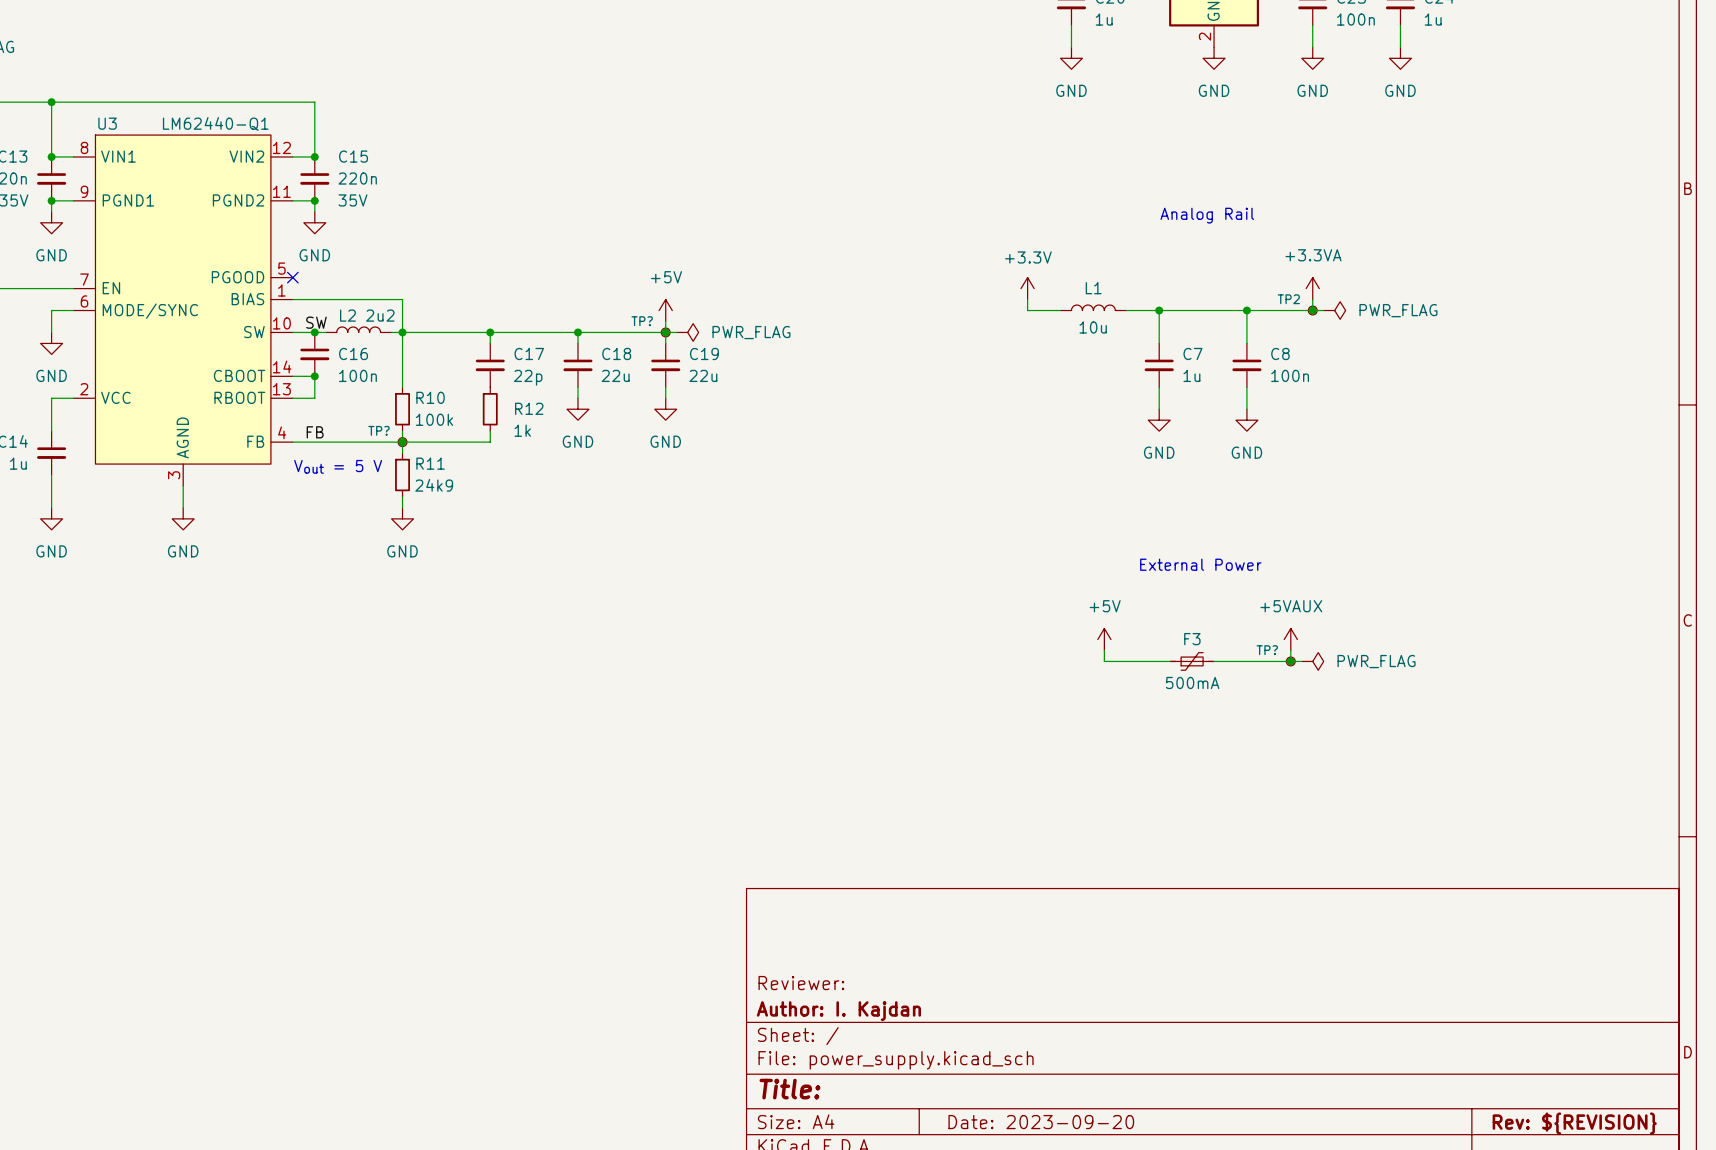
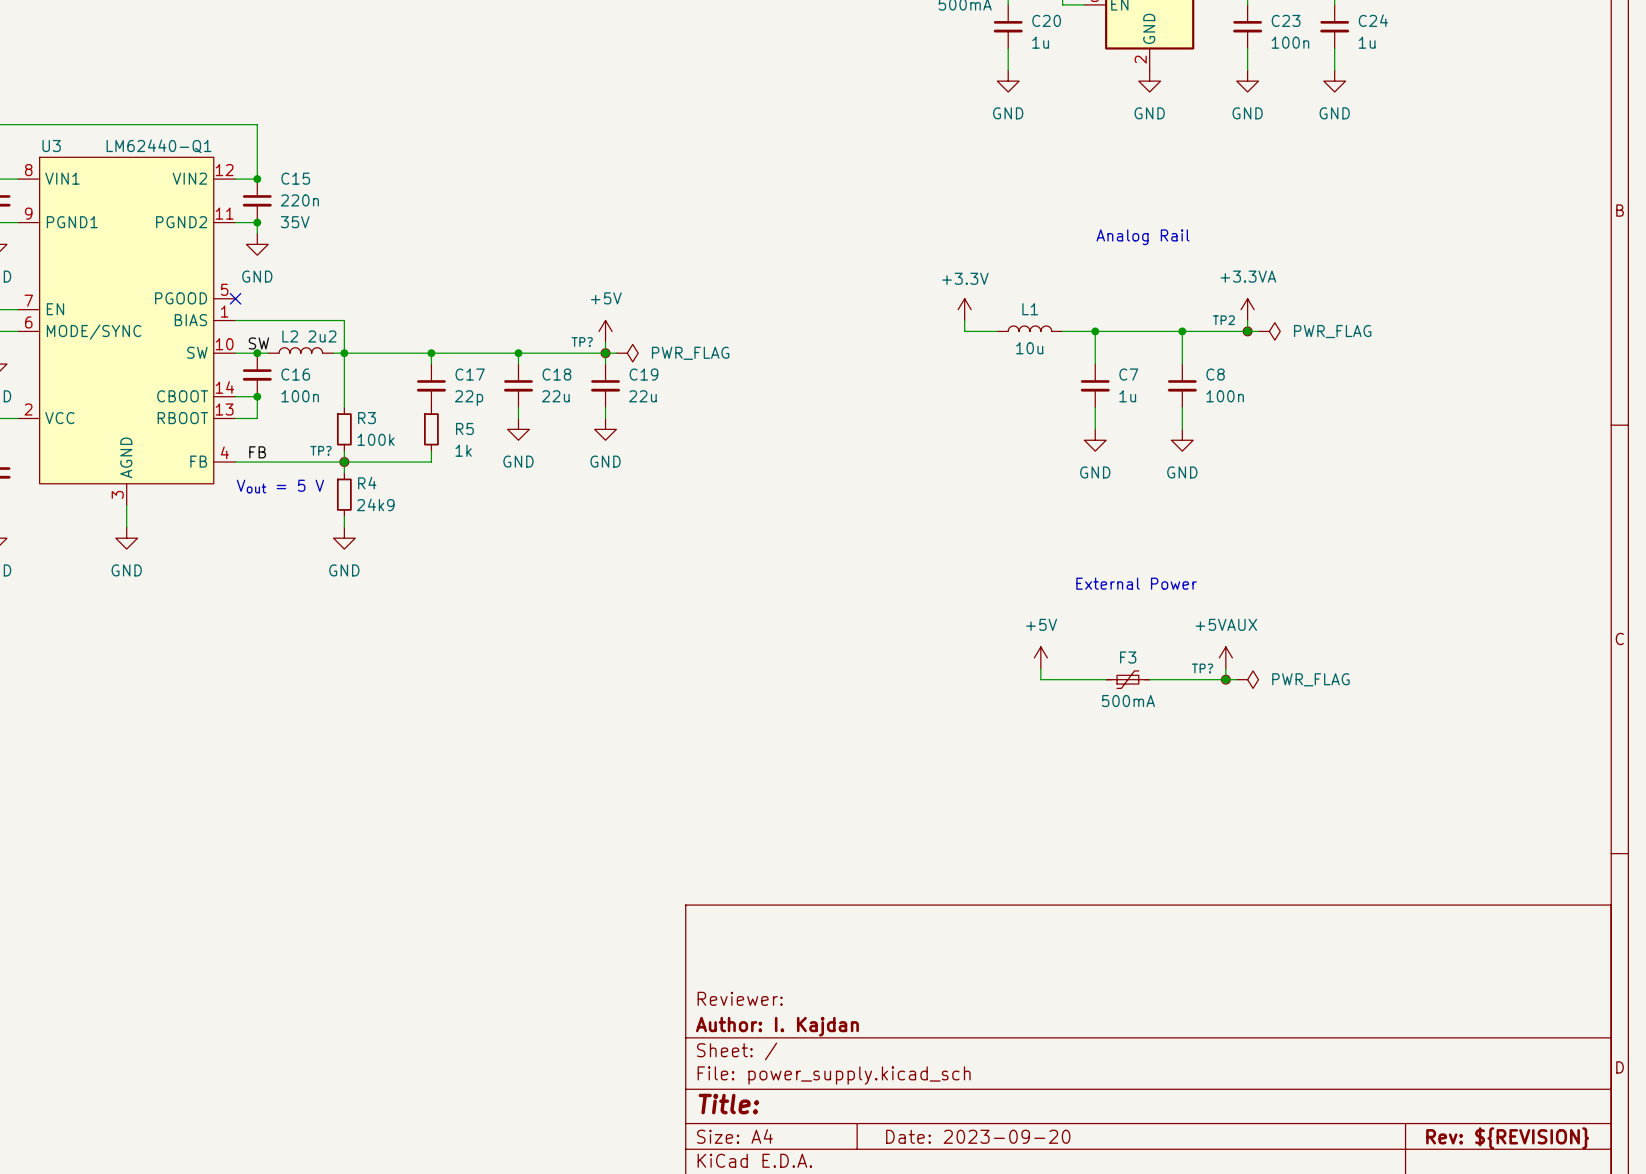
R10 name: R10 (430, 397) -> R3 (366, 418)
R12 name: R12 (529, 408) -> R5 (464, 428)
R11 name: R11 (430, 463) -> R4 (367, 483)

